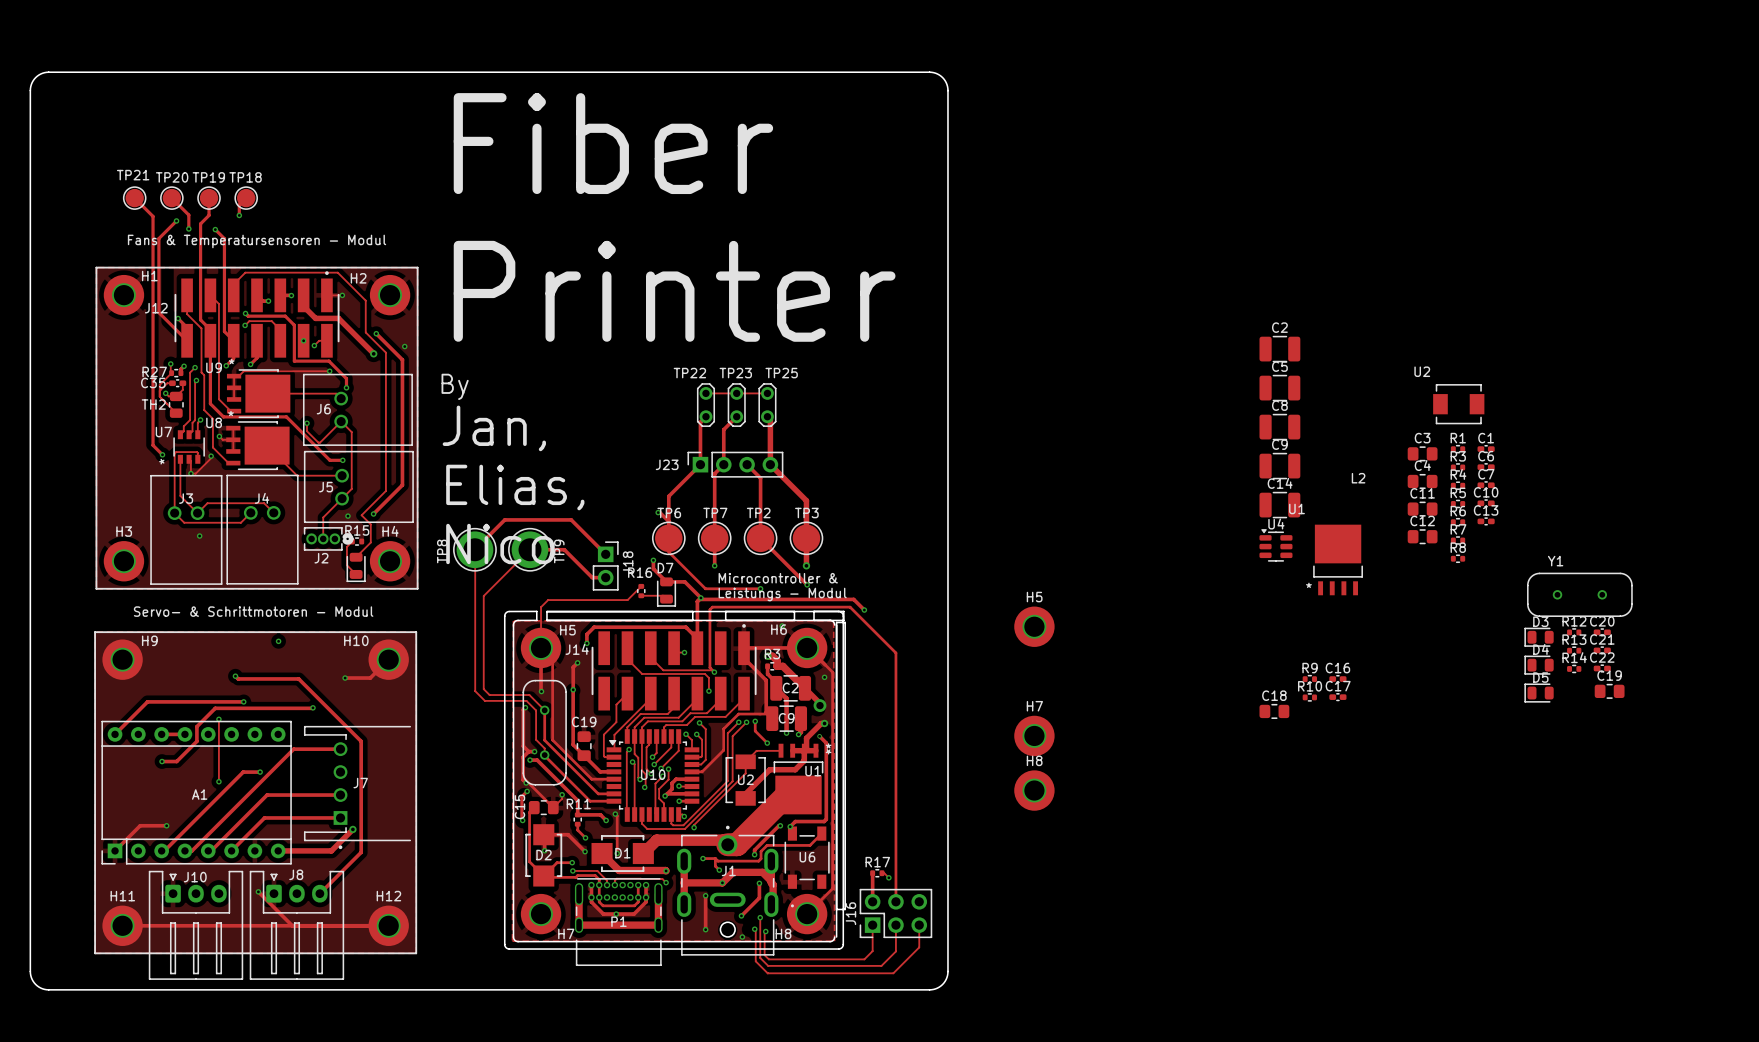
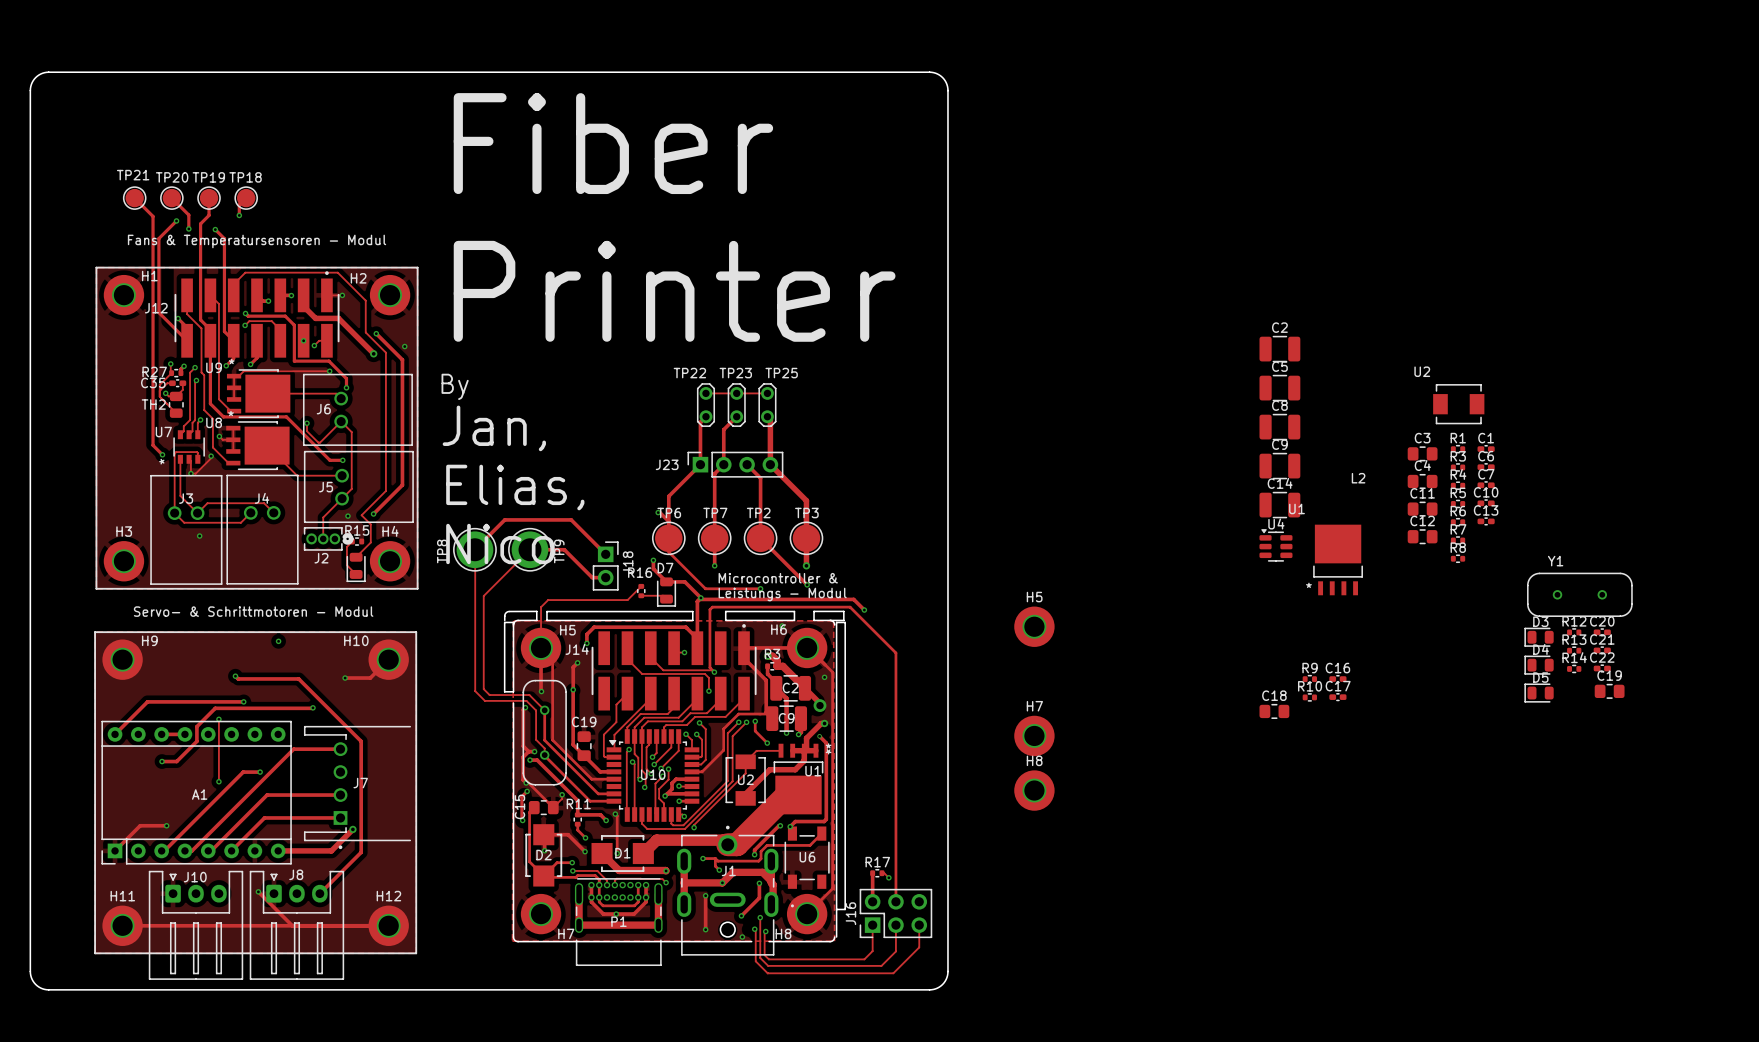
board edge: (546, 611) (838, 611) (842, 613) (843, 944) (841, 948) (506, 947) (504, 620) -> none
board edge: (794, 620) (814, 620) -> none
board edge: (513, 691) (513, 703) -> (513, 691) (504, 691) (504, 622) (513, 622) (513, 625)
board edge: (751, 941) (769, 941) -> none

